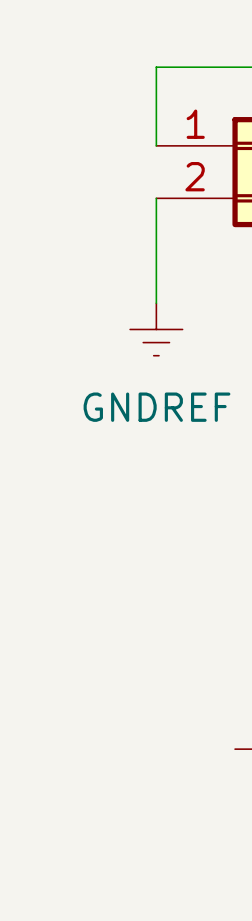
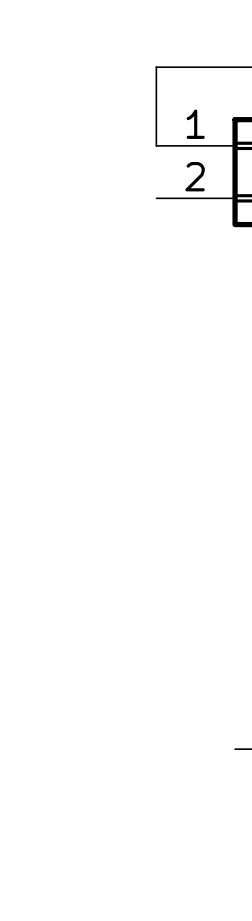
wire: (156, 198) (156, 303) -> none
power symbol: GNDREF (156, 329) -> none

